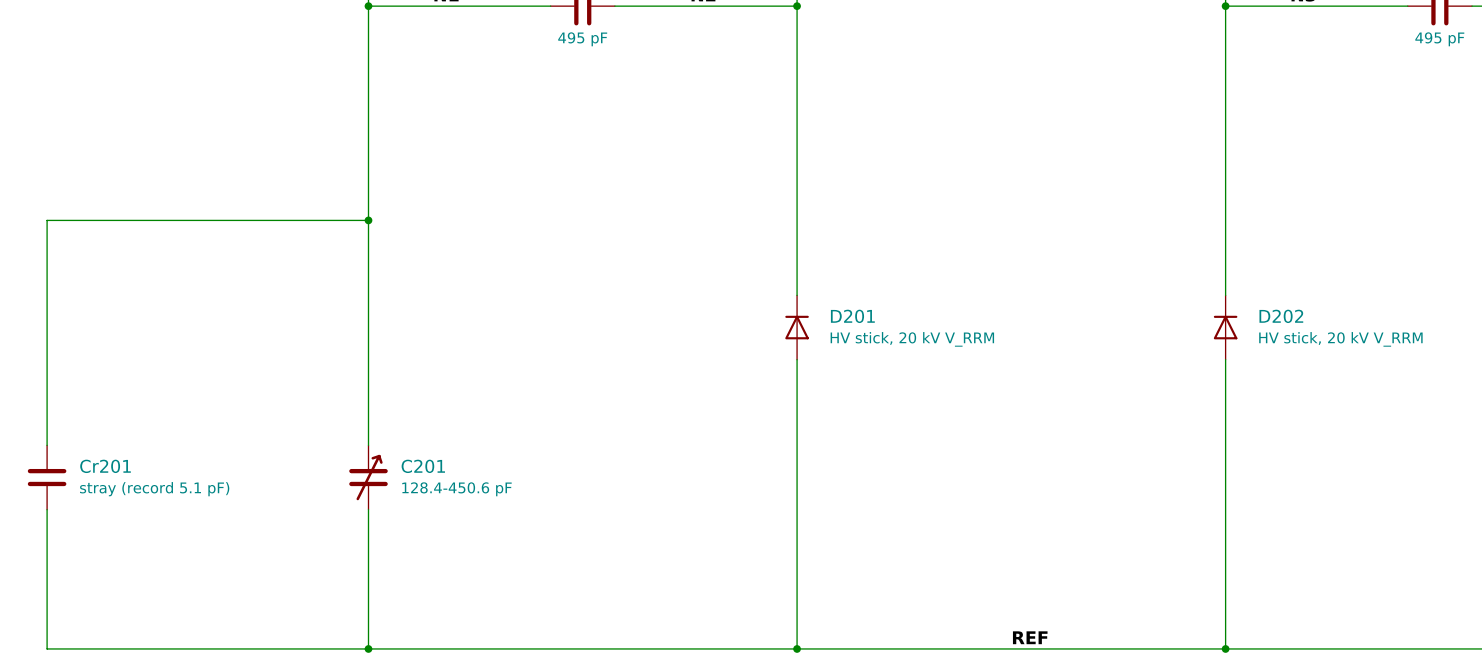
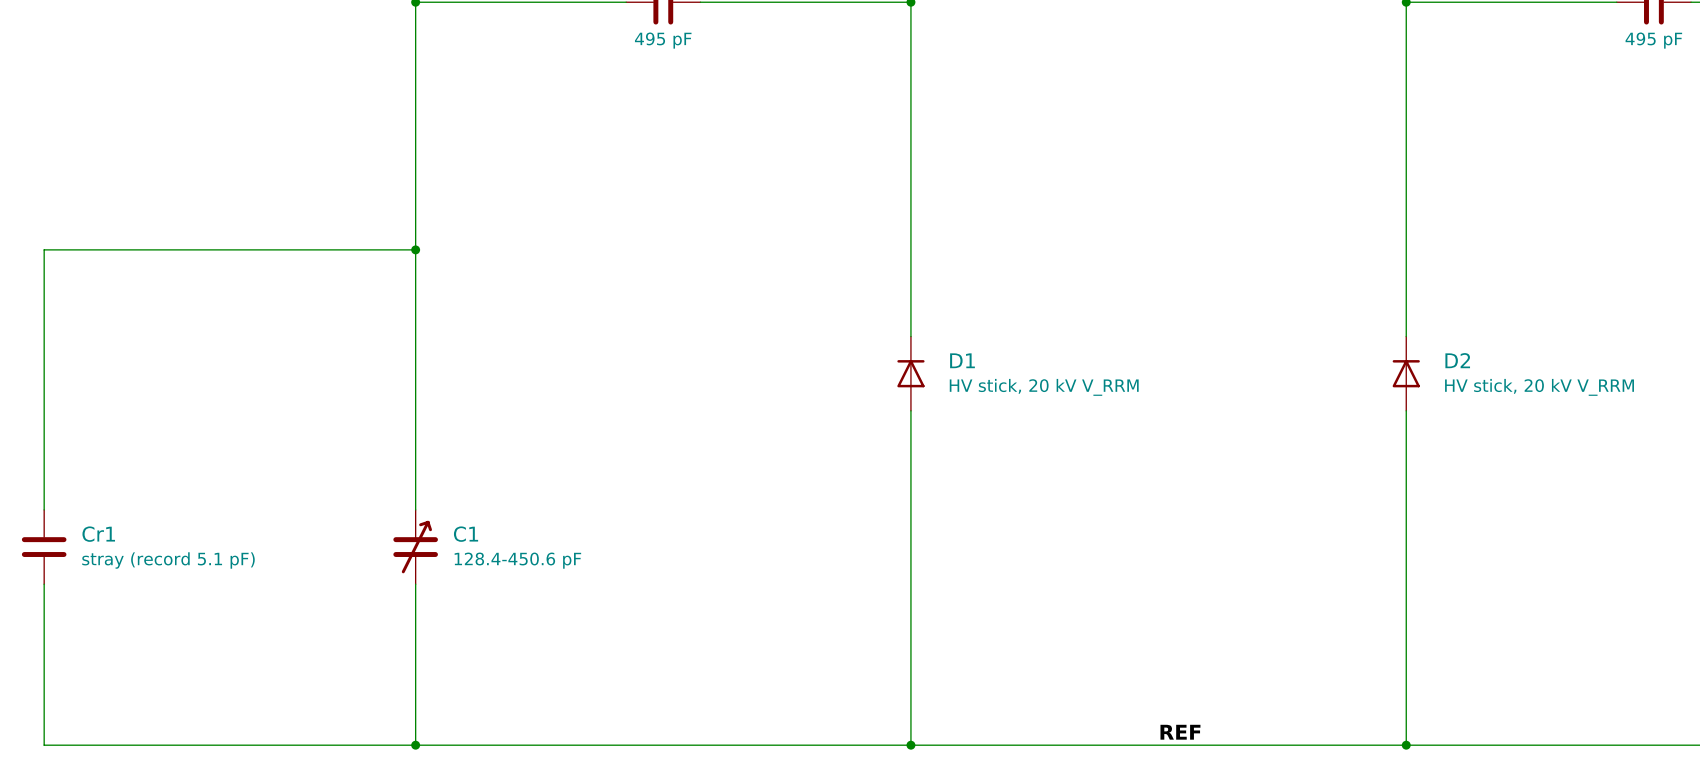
D201 name: D201 (852, 316) -> D1 (962, 360)
D202 name: D202 (1281, 316) -> D2 (1457, 360)
Cr201 name: Cr201 (105, 466) -> Cr1 (98, 534)
C201 name: C201 (423, 466) -> C1 (466, 534)

